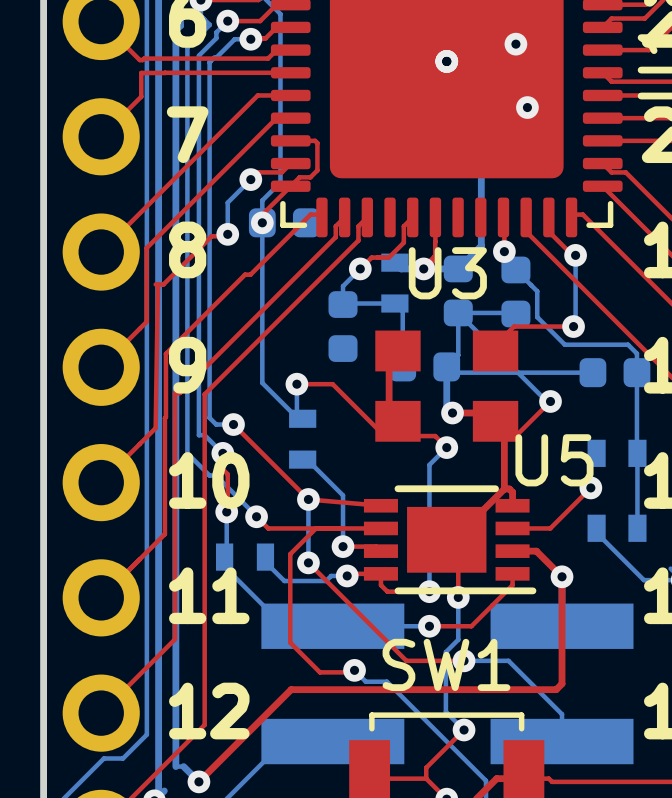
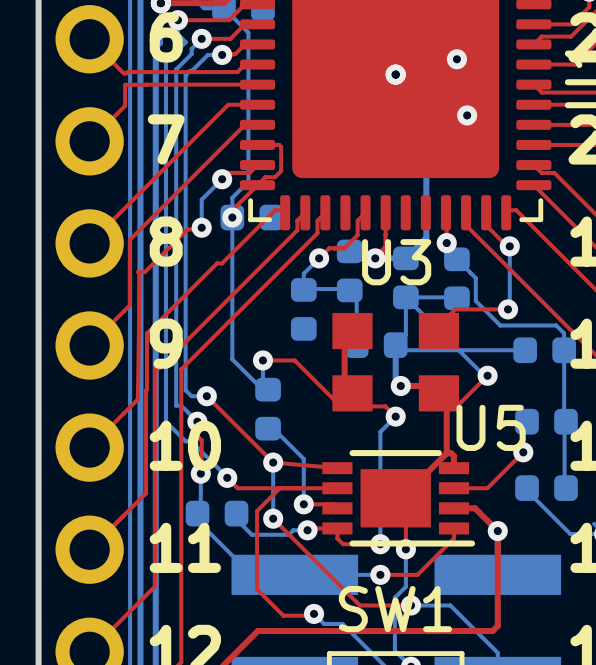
part footprint: [381, 253, 409, 313] -> [336, 239, 363, 303]
part footprint: [289, 409, 317, 469] -> [255, 377, 281, 441]
part footprint: [587, 439, 647, 467] -> [515, 408, 578, 435]
part footprint: [587, 514, 647, 542] -> [515, 475, 578, 501]
part footprint: [215, 543, 275, 571] -> [185, 500, 249, 527]

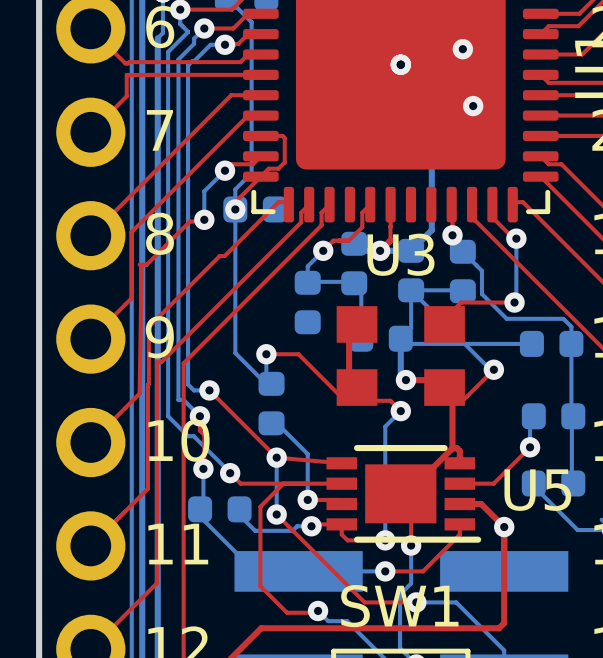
U5 name position: U5 (491, 427) -> U5 (537, 490)

